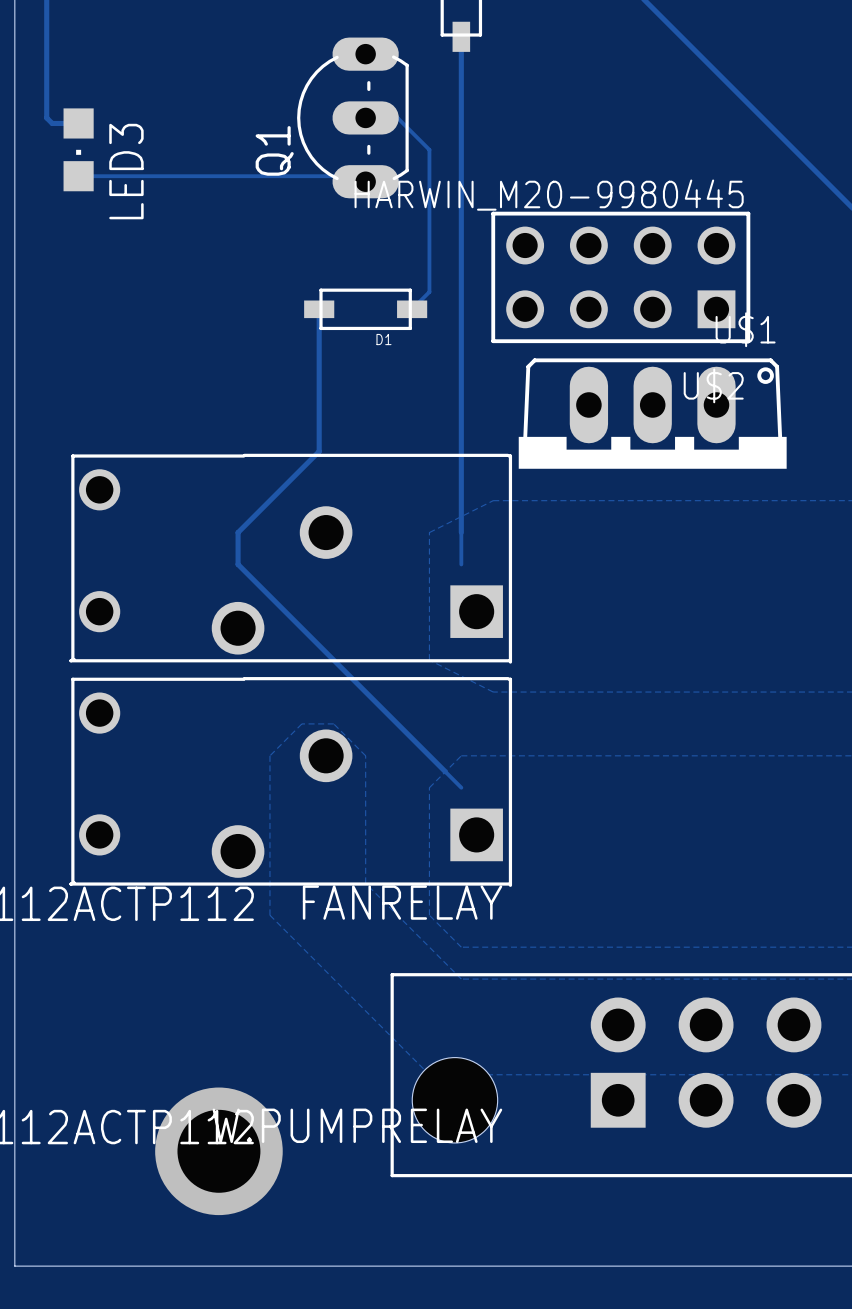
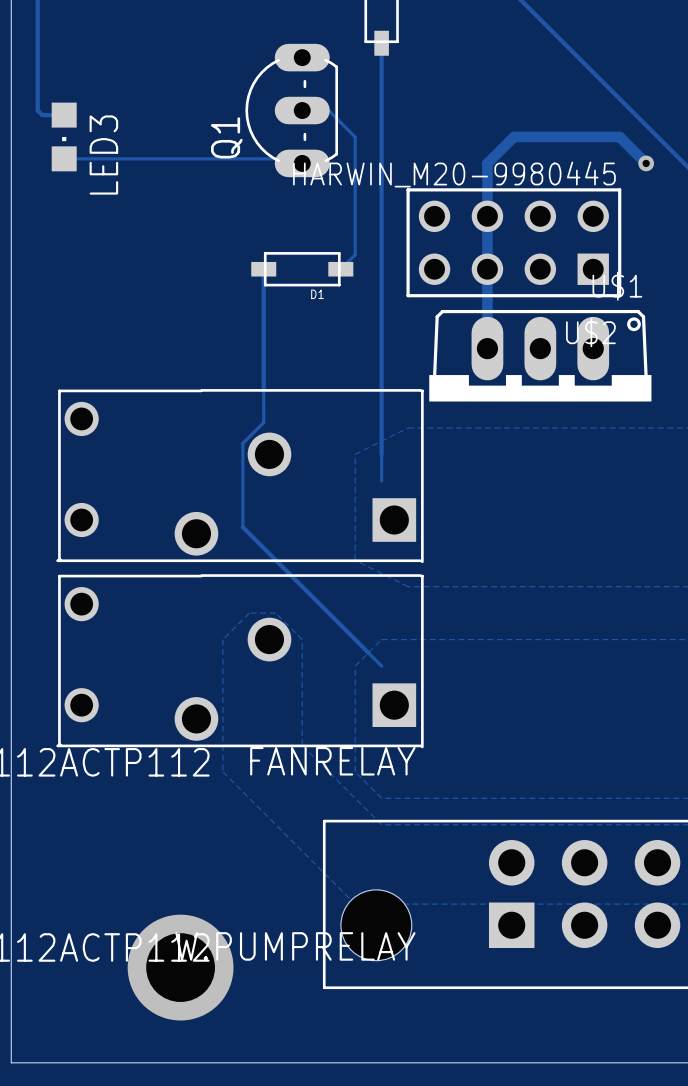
track: none -> (646, 163) (619, 136) (513, 136) (487, 163) (487, 348)
via: none -> (646, 163)
track: (319, 451) (238, 532) (238, 564) (294, 620) -> (263, 387) (263, 422) (242, 443) (242, 527)

